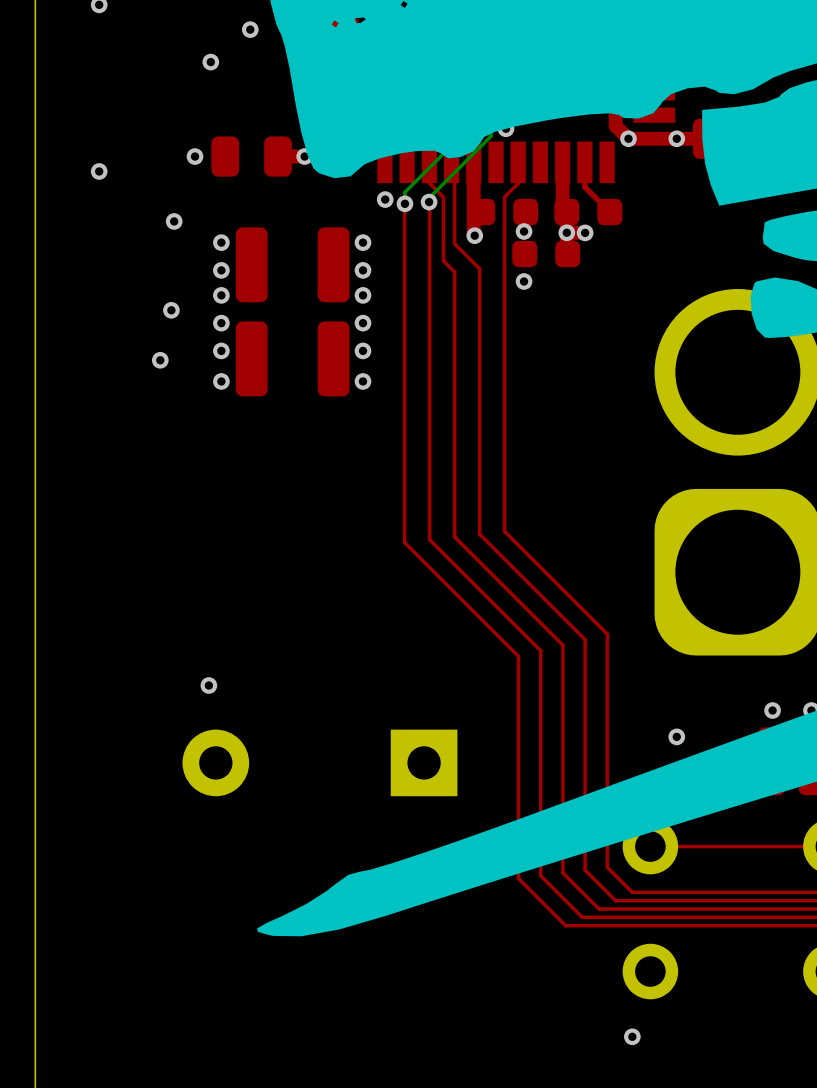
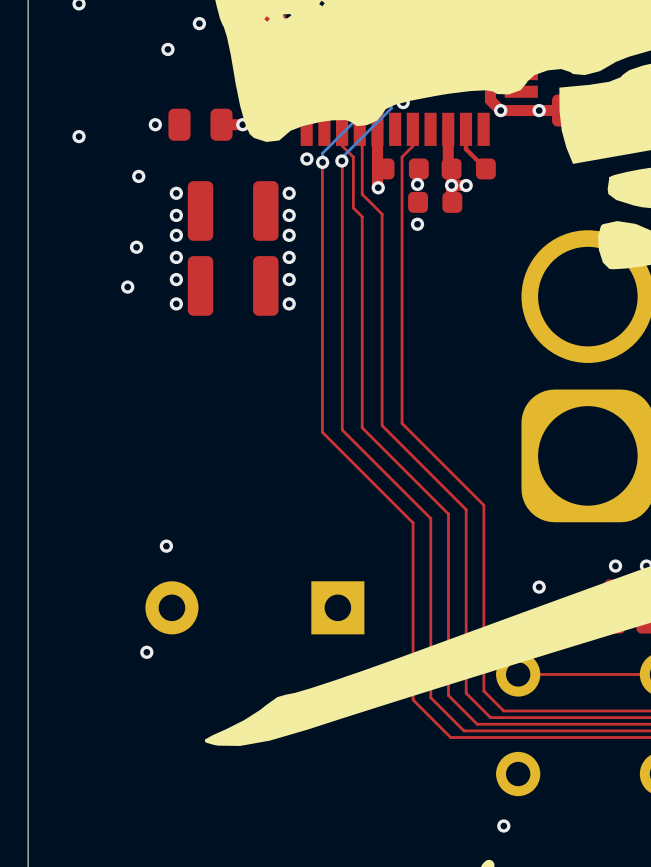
via: none -> (146, 652)

